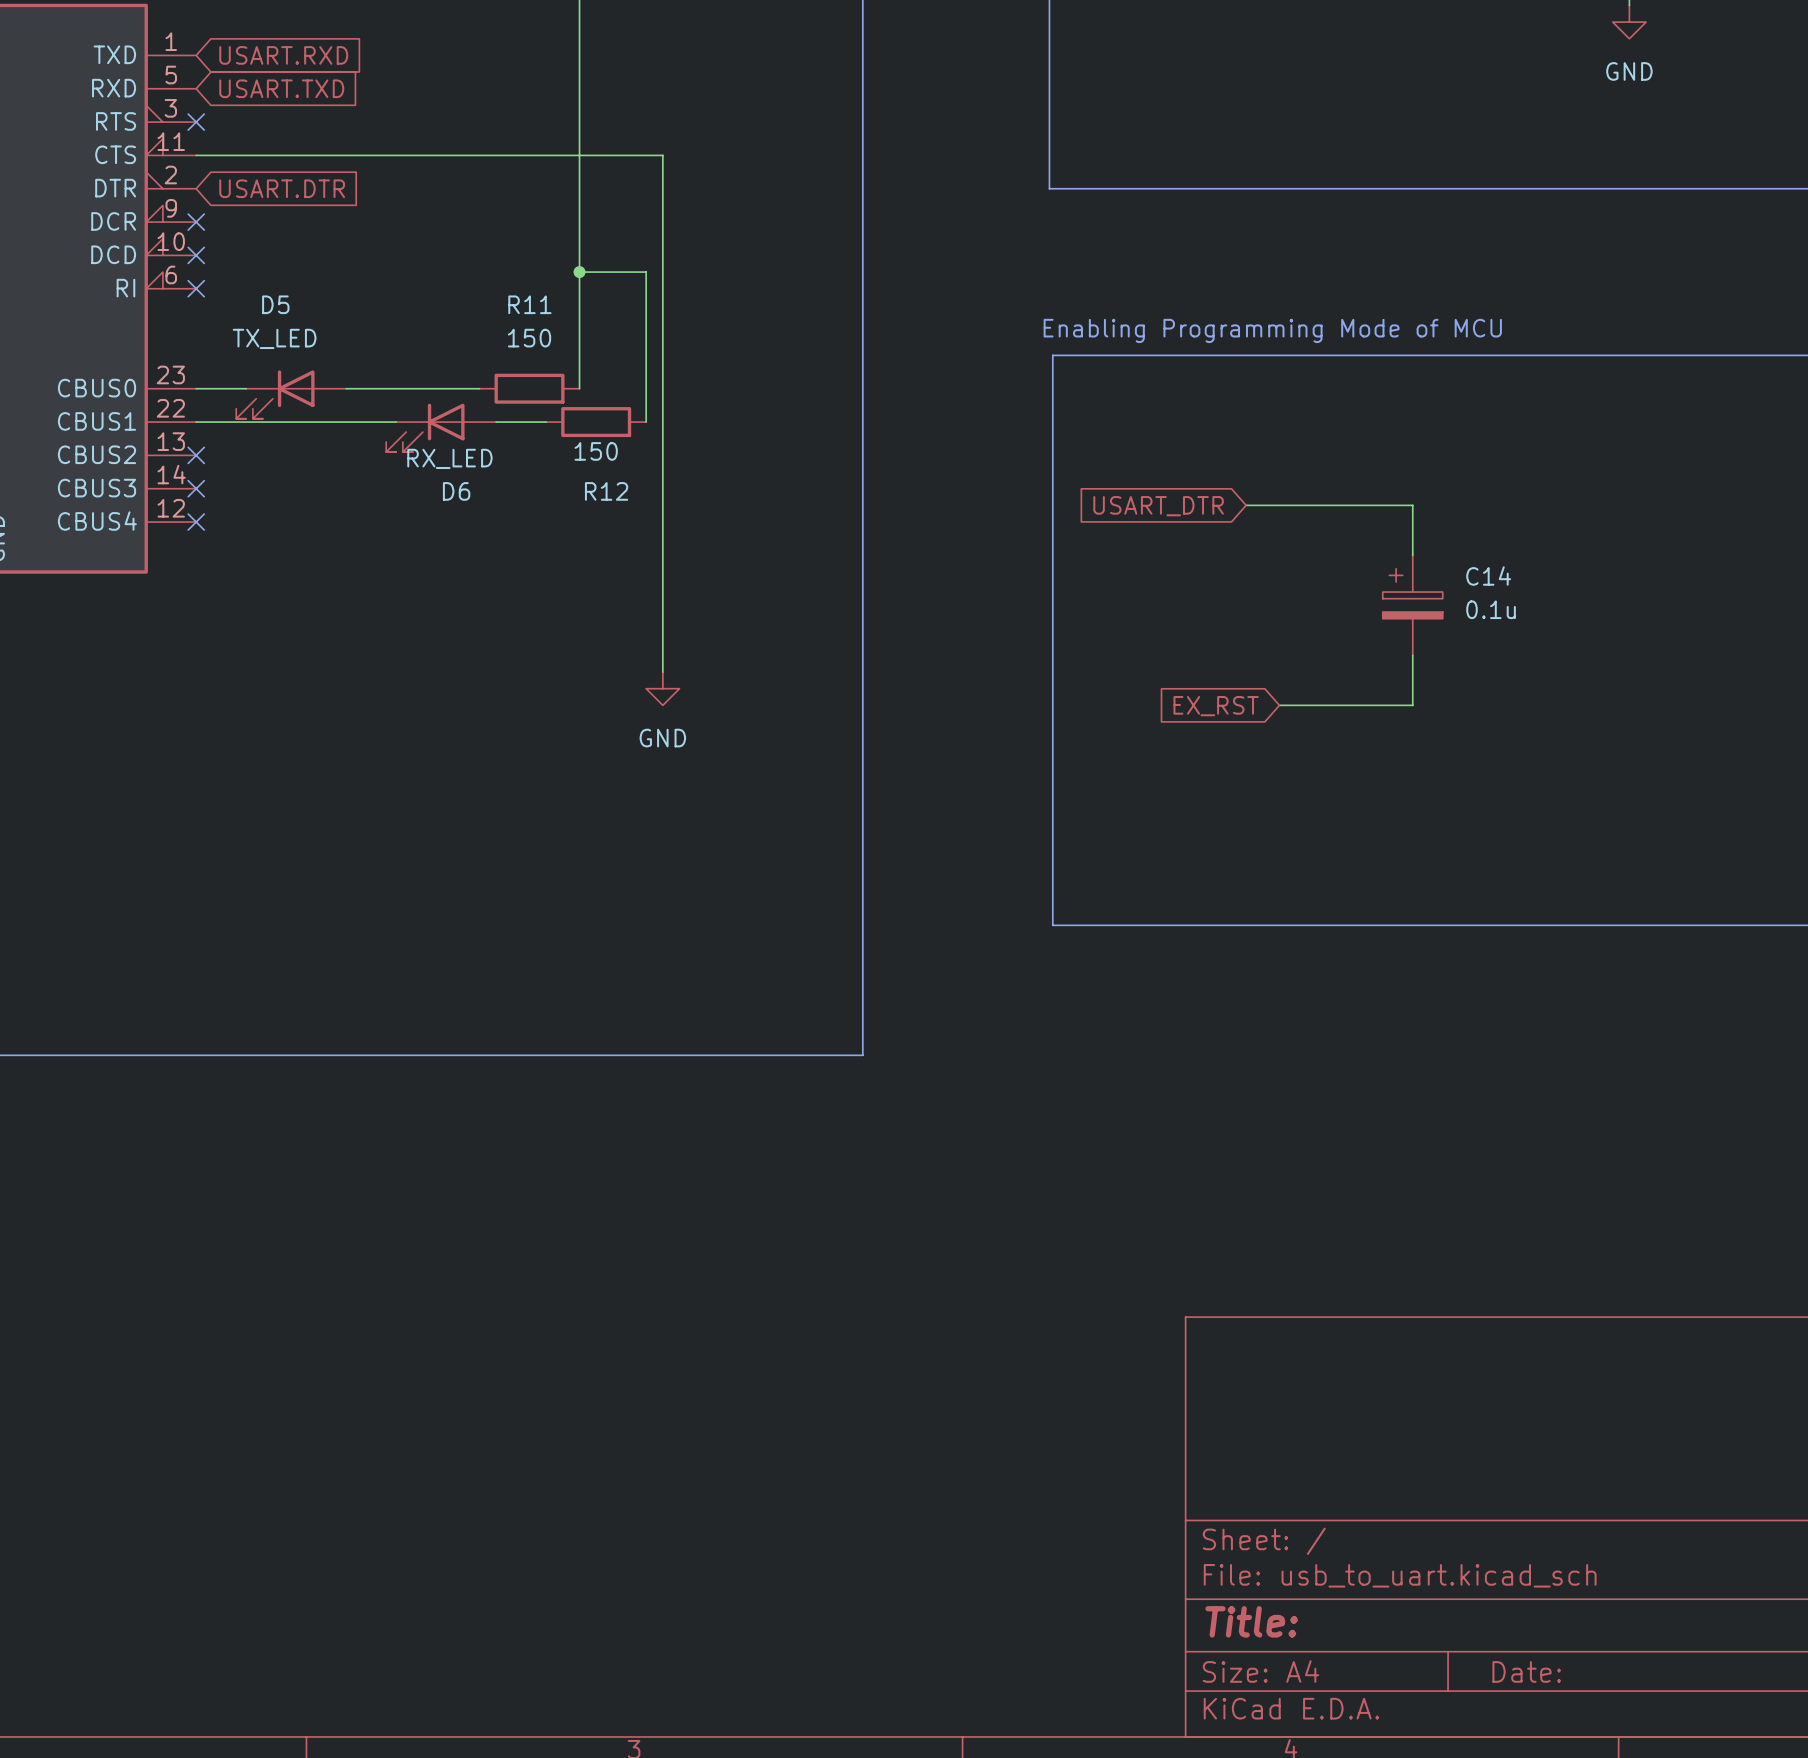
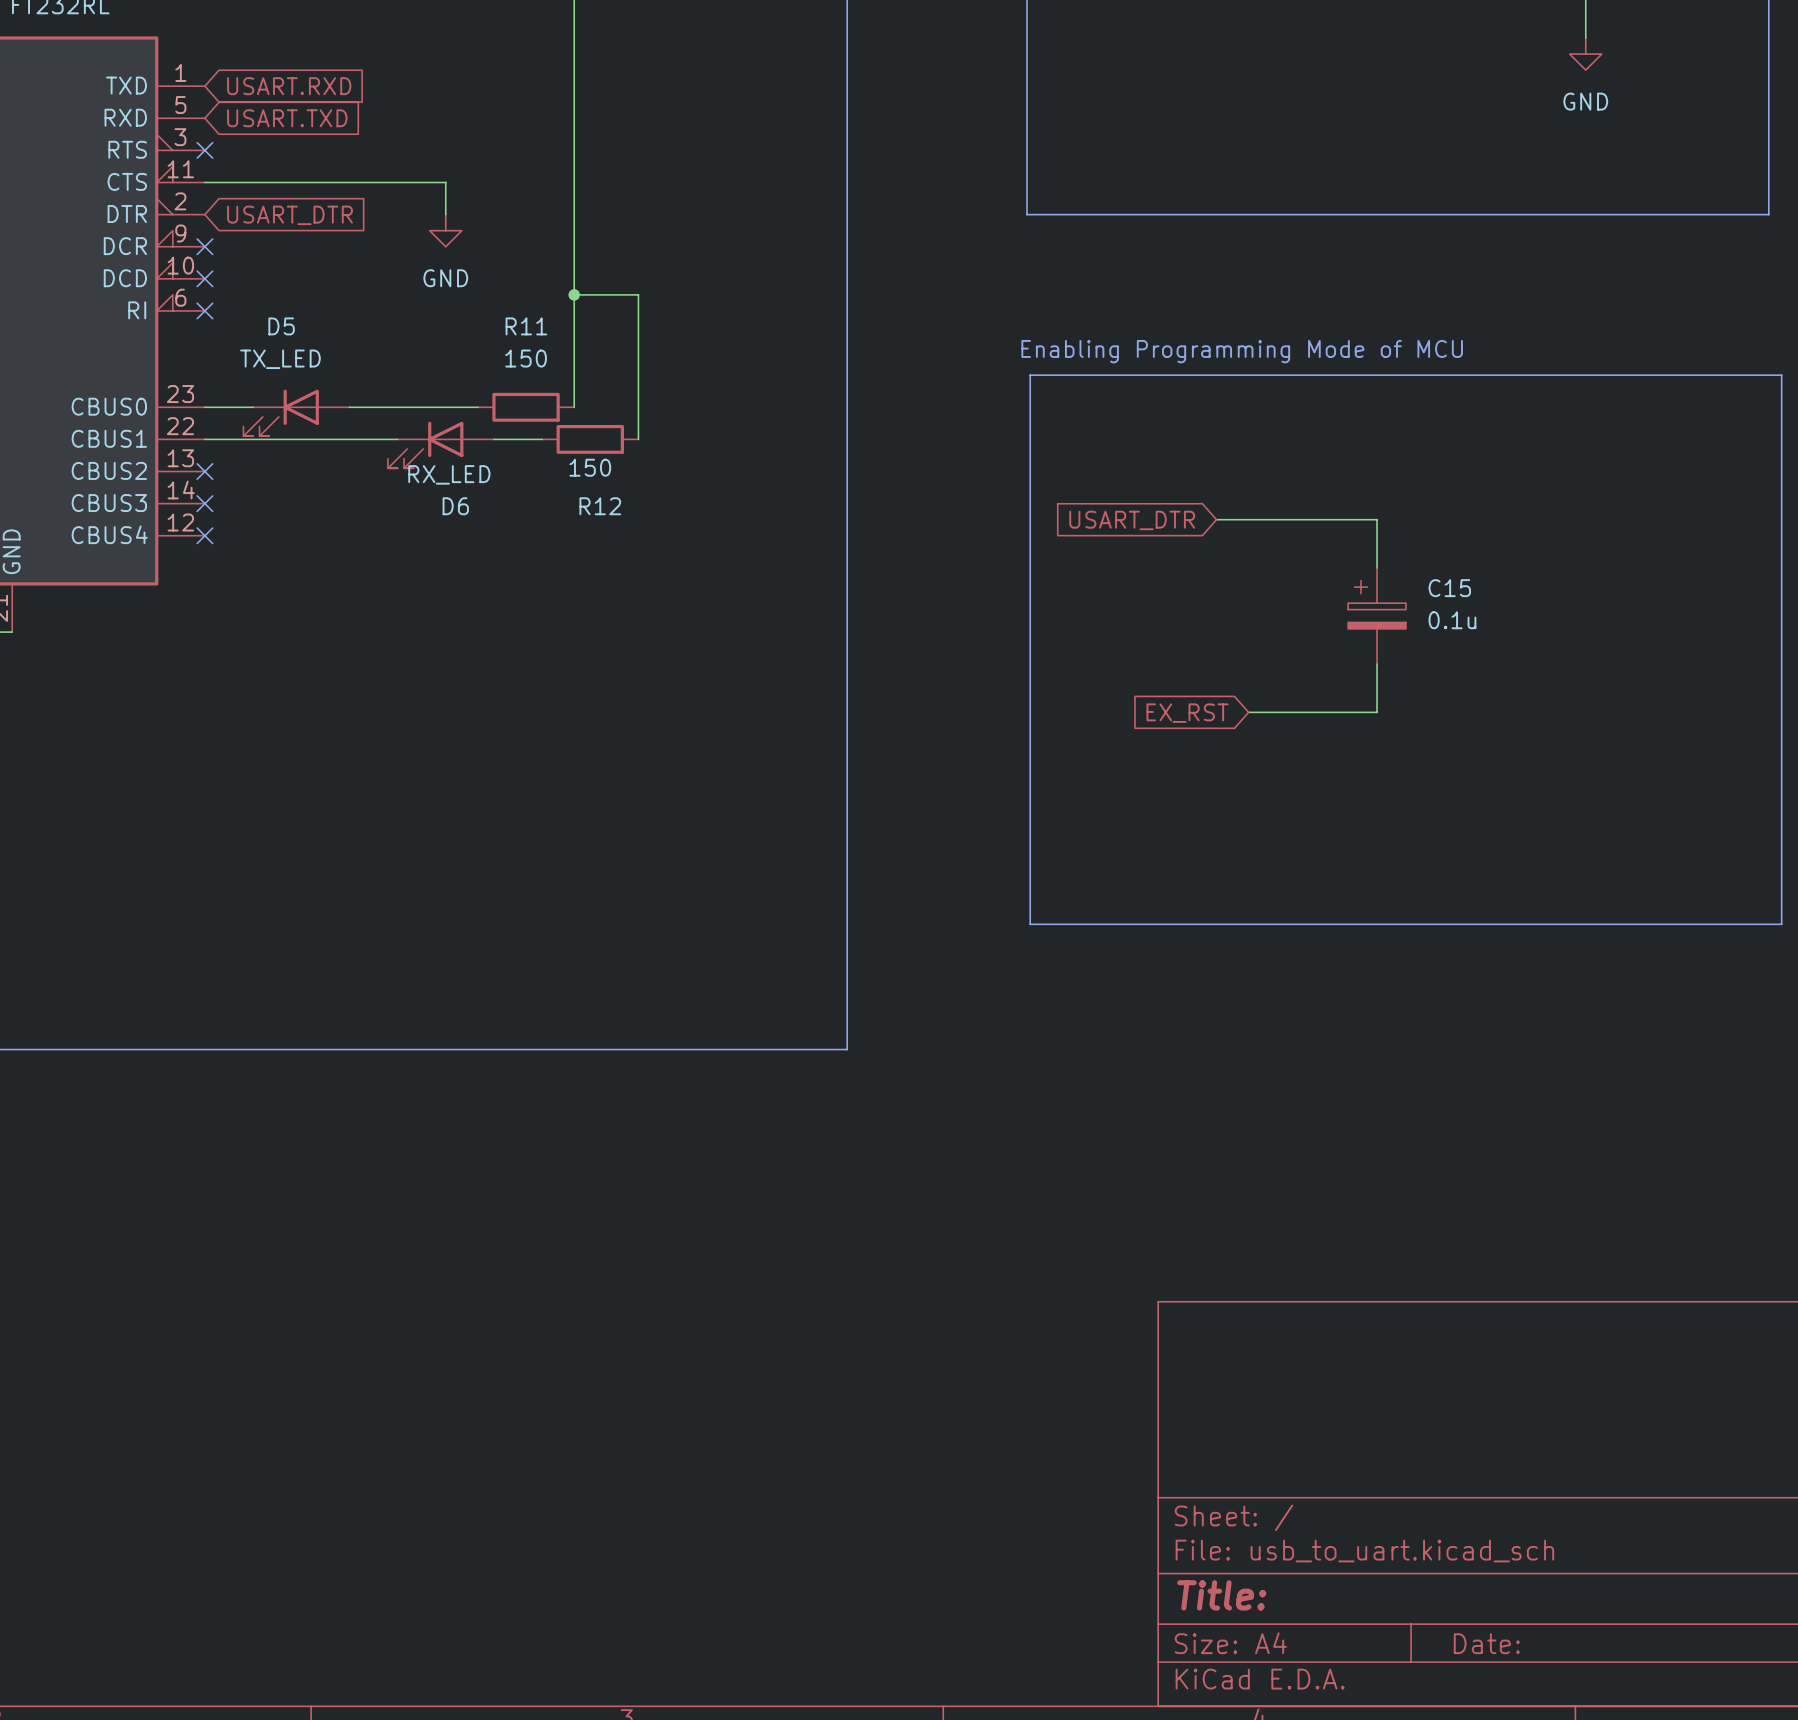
wire: (446, 155) (662, 155) (662, 672) -> (445, 182) (445, 214)
global label: USART.DTR (282, 188) -> USART_DTR (290, 215)
power symbol: none -> GND (445, 230)
C14 name: C14 (1488, 576) -> C15 (1449, 588)
power symbol: GND (662, 688) -> none

